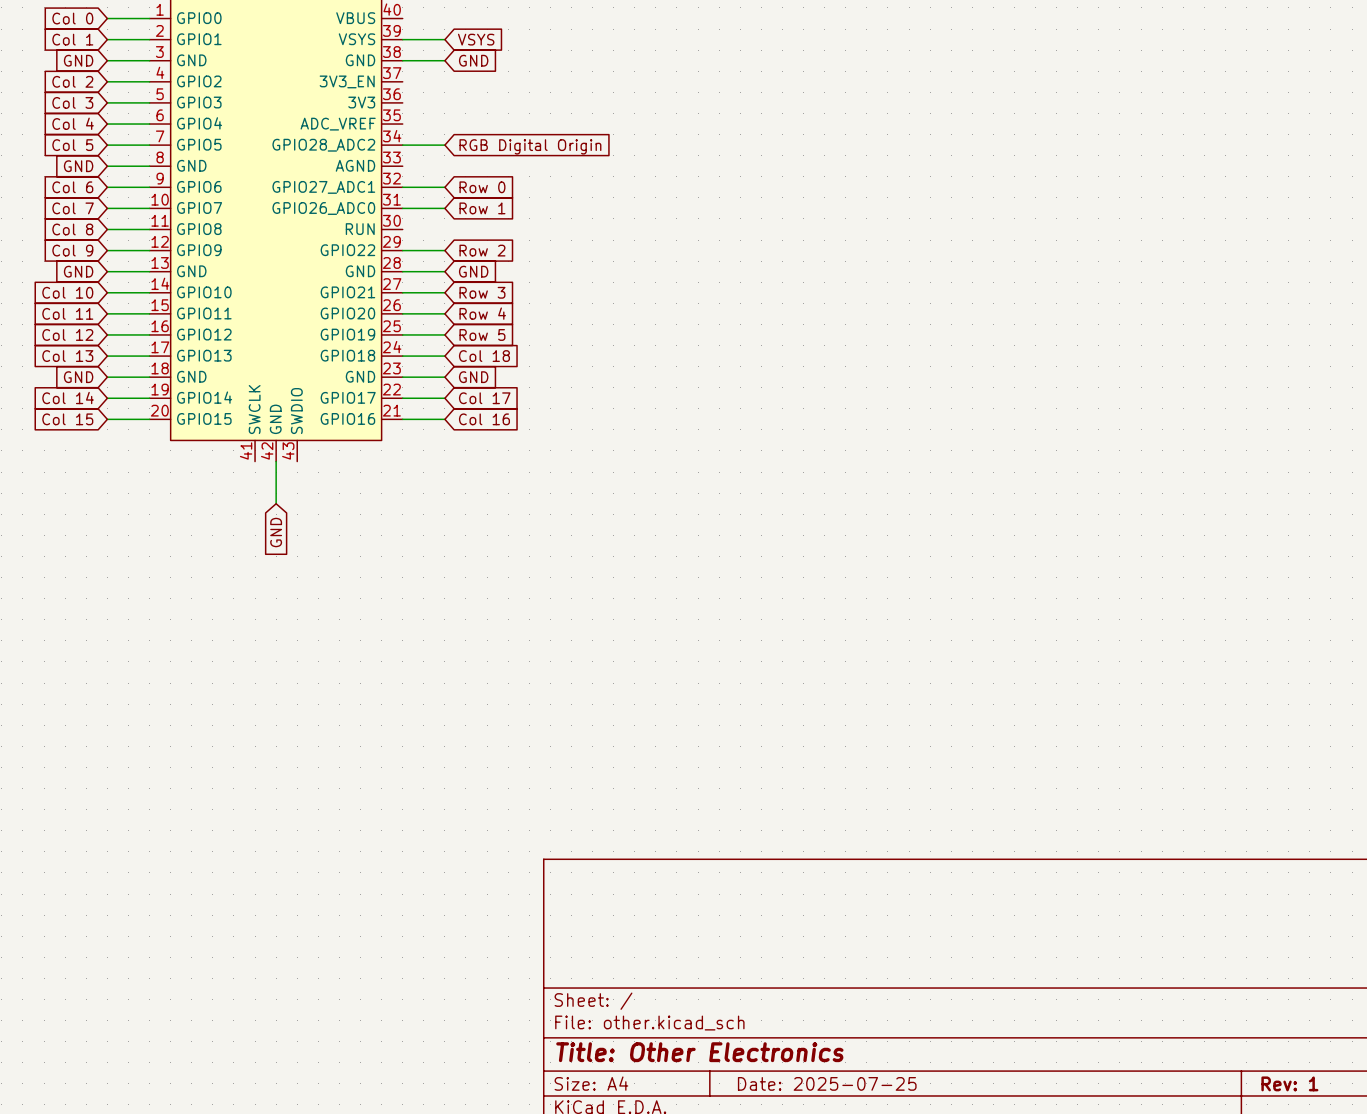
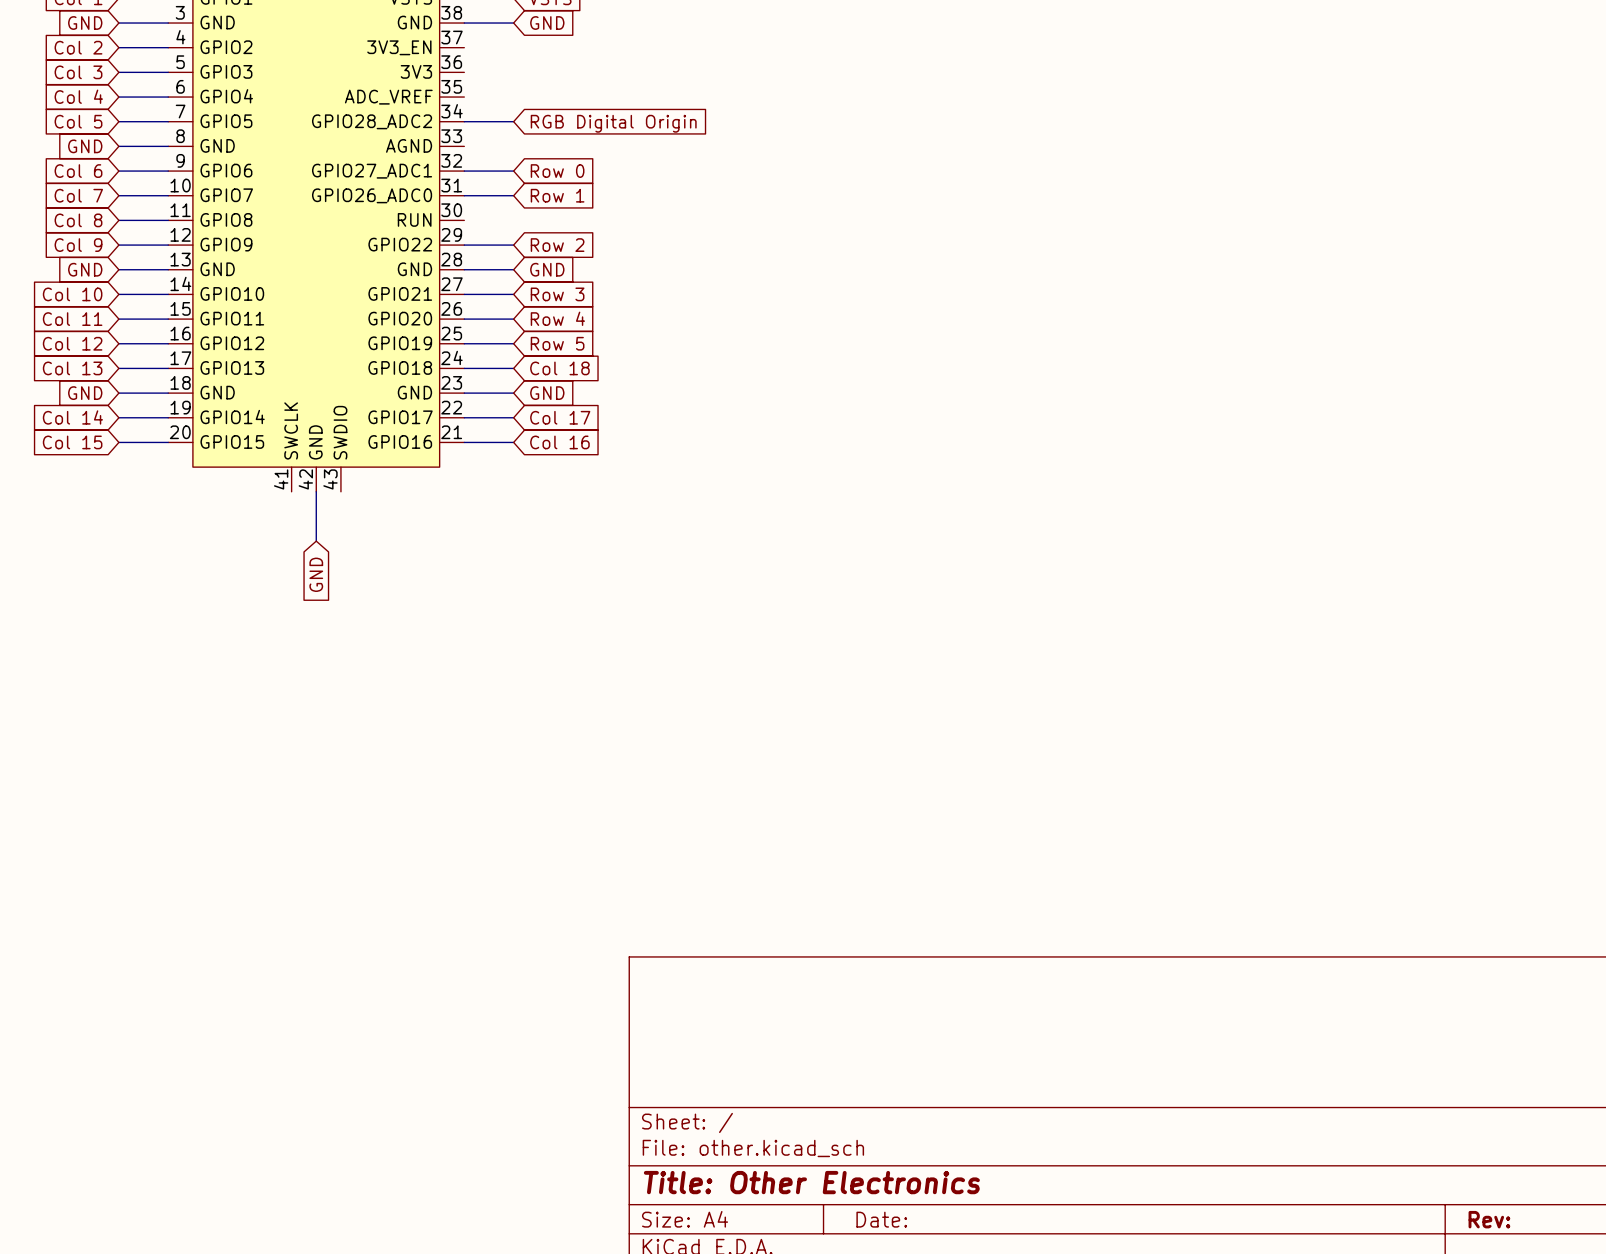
title block: Date: 2025-07-25 (827, 1083) -> Date: (881, 1219)
title block: Rev: 1 (1289, 1083) -> Rev: (1489, 1219)

